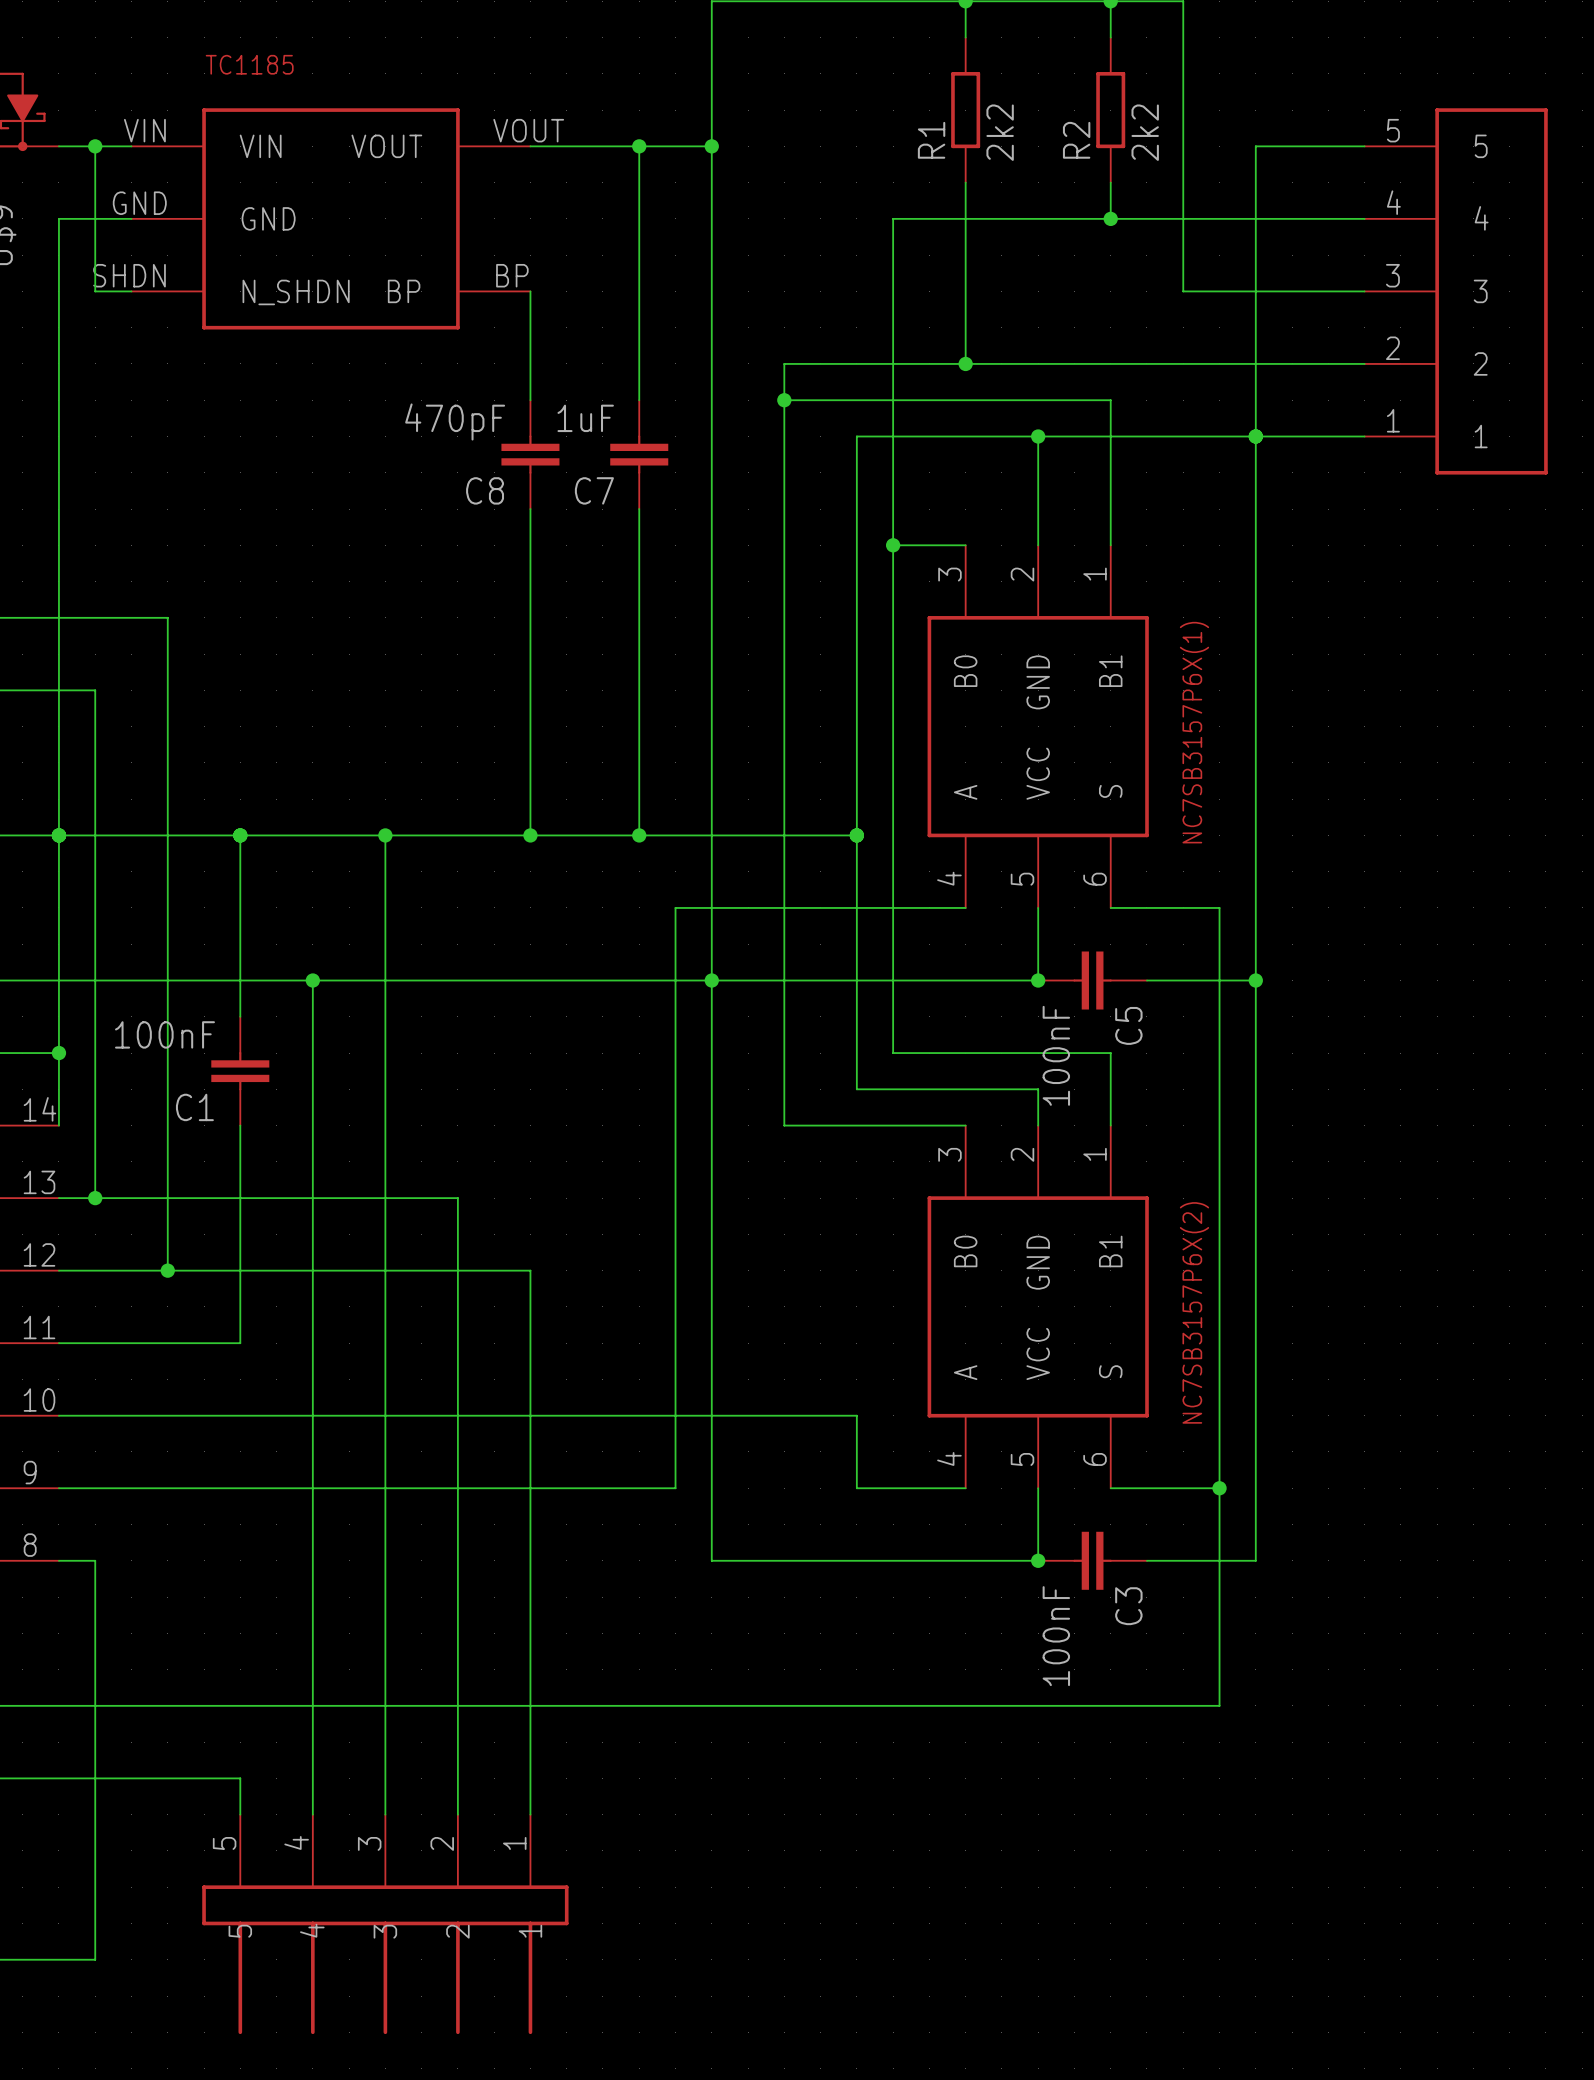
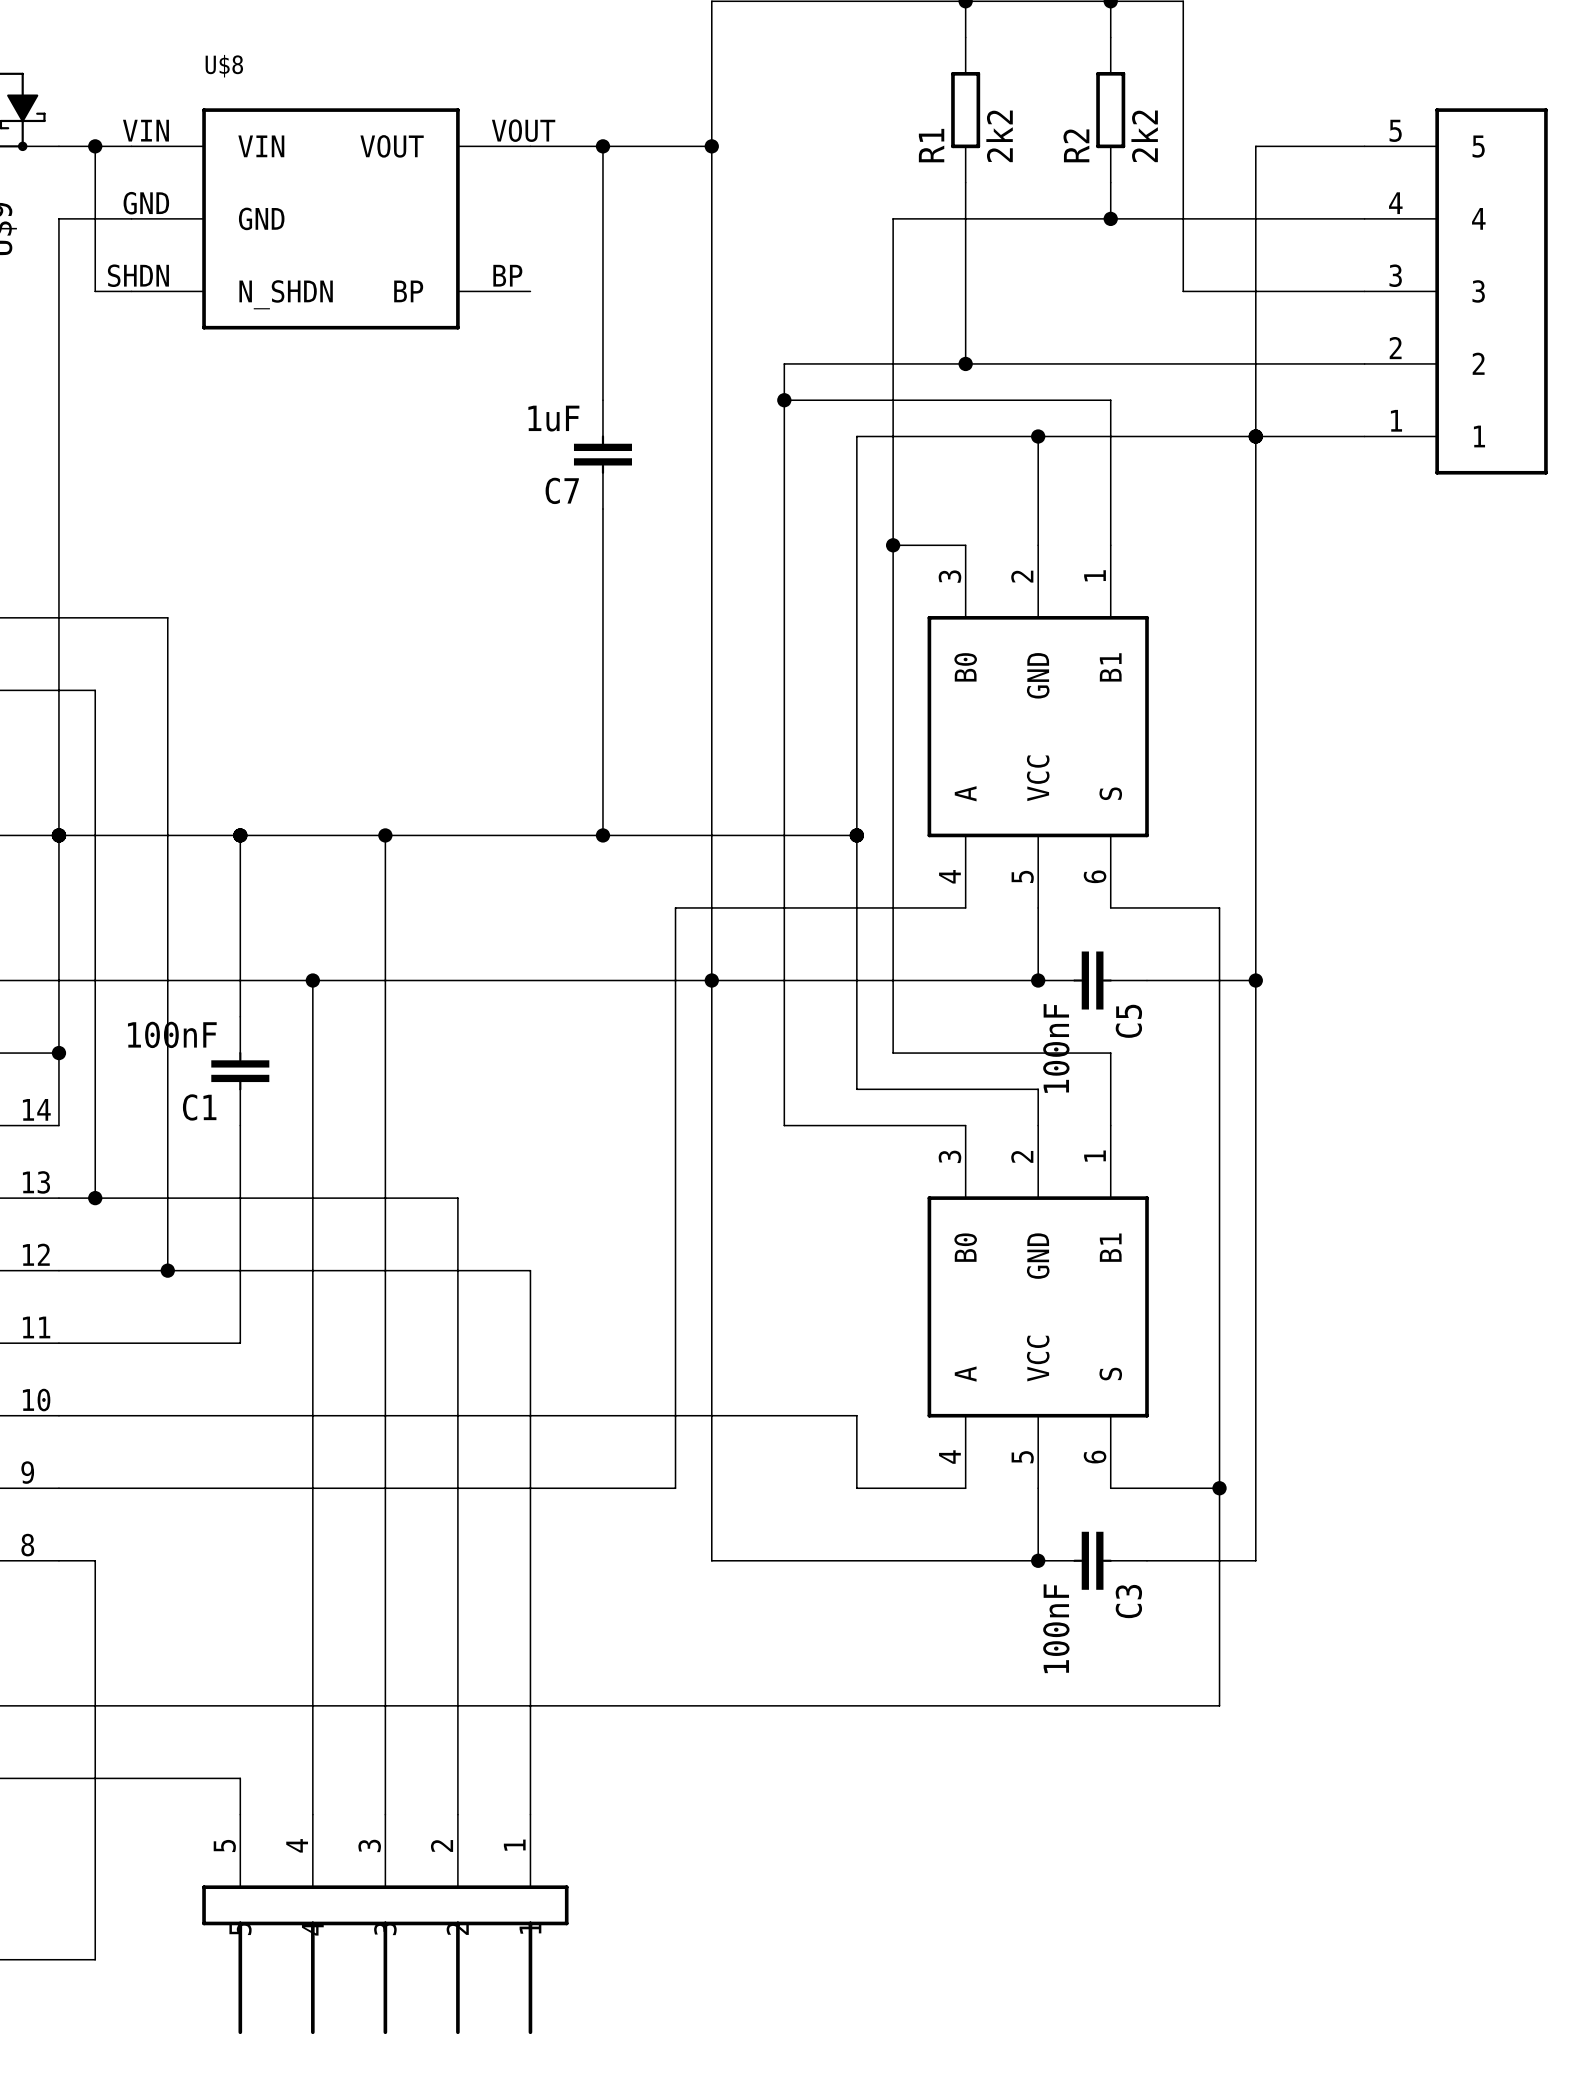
TC1185 name: TC1185 (249, 64) -> U$8 (224, 66)
wire: (639, 146) (639, 400) -> (602, 146) (602, 400)
junction position: (639, 146) -> (602, 146)
wire: (530, 291) (530, 400) -> none
C8: 470pF (530, 454) -> none
C7 position: (639, 454) -> (602, 454)
wire: (530, 509) (530, 835) -> none
wire: (639, 509) (639, 835) -> (602, 509) (602, 835)
NC7SB3157P6X(1) name: NC7SB3157P6X(1) (1194, 732) -> none
junction: (530, 835) -> none
junction: none -> (602, 835)
junction: (639, 835) -> none
NC7SB3157P6X(2) name: NC7SB3157P6X(2) (1194, 1312) -> none

